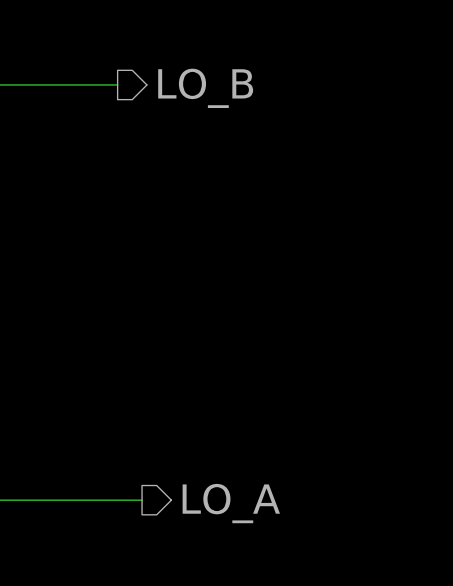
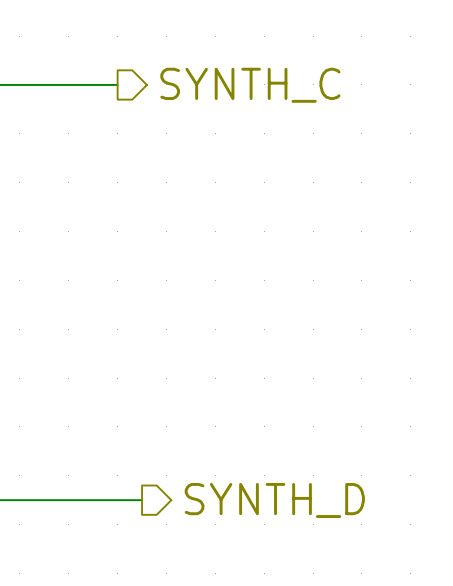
hierarchical label: LO_B (205, 88) -> SYNTH_C (250, 85)
hierarchical label: LO_A (231, 503) -> SYNTH_D (274, 500)

